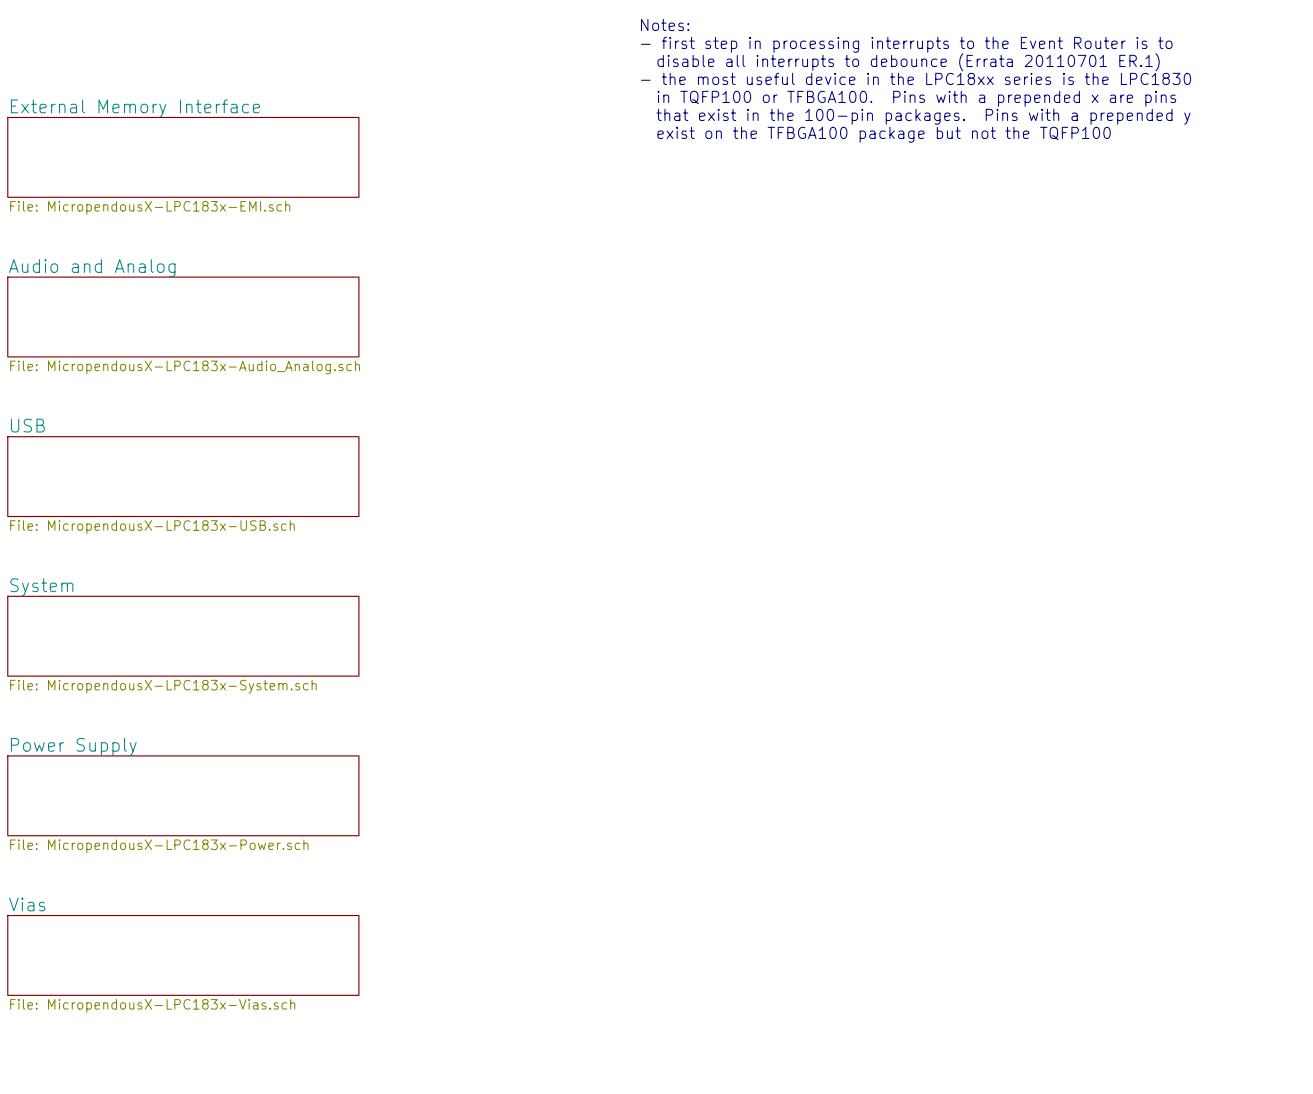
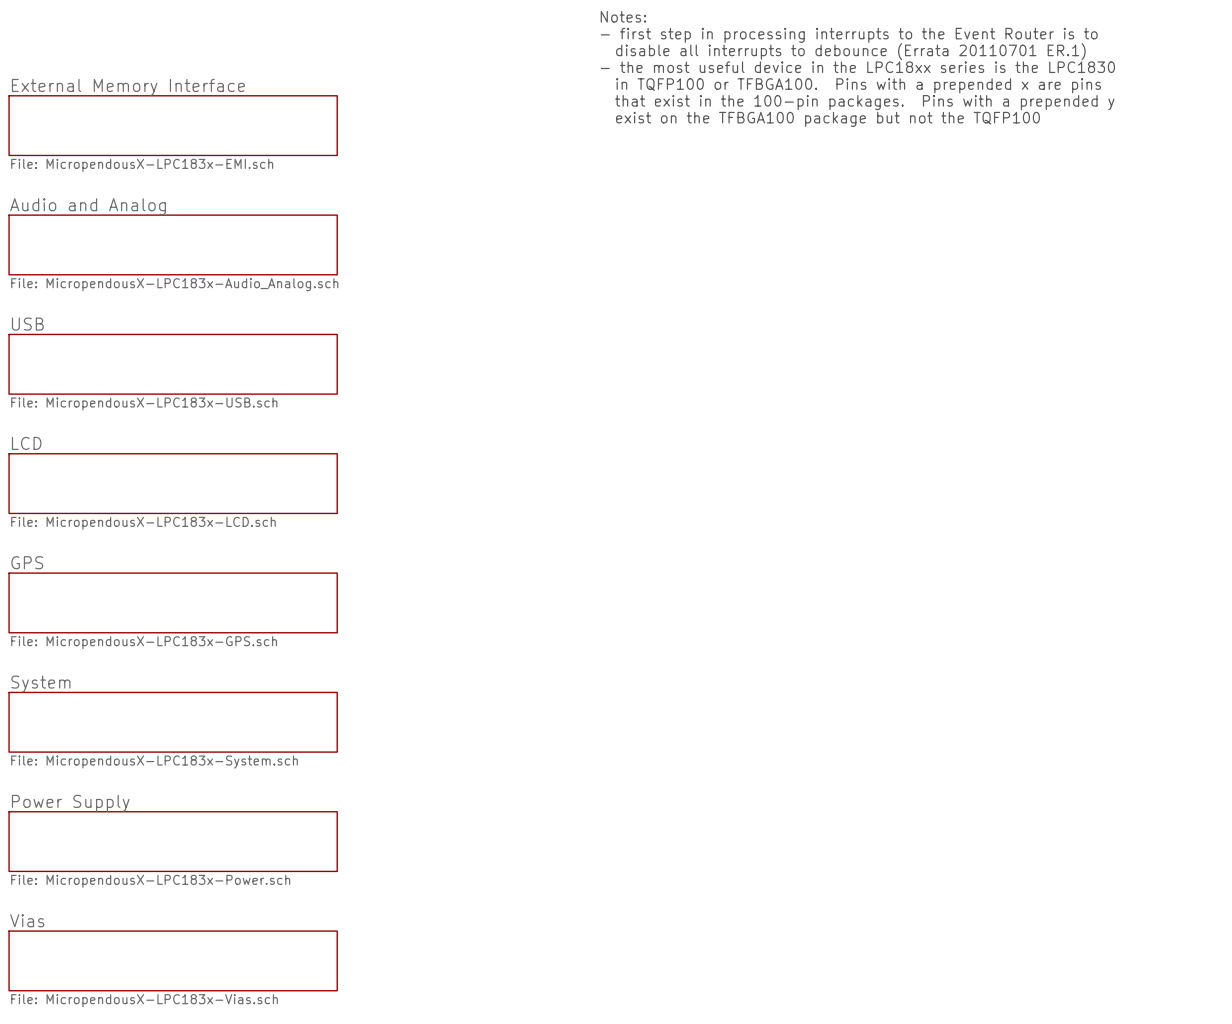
sheet External Memory Interface: none -> File: MicropendousX-LPC183x-EMI.sch (173, 125)
sheet External Memory Interface: File: MicropendousX-LPC183x-EMI.sch (183, 157) -> none
sheet Audio and Analog: none -> File: MicropendousX-LPC183x-Audio_Analog.sch (173, 244)
sheet Audio and Analog: File: MicropendousX-LPC183x-Audio_Analog.sch (183, 316) -> none
sheet USB: none -> File: MicropendousX-LPC183x-USB.sch (173, 364)
sheet USB: File: MicropendousX-LPC183x-USB.sch (183, 476) -> none
sheet LCD: none -> File: MicropendousX-LPC183x-LCD.sch (173, 483)
sheet System: File: MicropendousX-LPC183x-System.sch (183, 636) -> none
sheet GPS: none -> File: MicropendousX-LPC183x-GPS.sch (173, 602)
sheet System: none -> File: MicropendousX-LPC183x-System.sch (173, 722)
sheet Power Supply: File: MicropendousX-LPC183x-Power.sch (183, 795) -> none
sheet Power Supply: none -> File: MicropendousX-LPC183x-Power.sch (173, 841)
sheet Vias: File: MicropendousX-LPC183x-Vias.sch (183, 955) -> none
sheet Vias: none -> File: MicropendousX-LPC183x-Vias.sch (173, 960)

